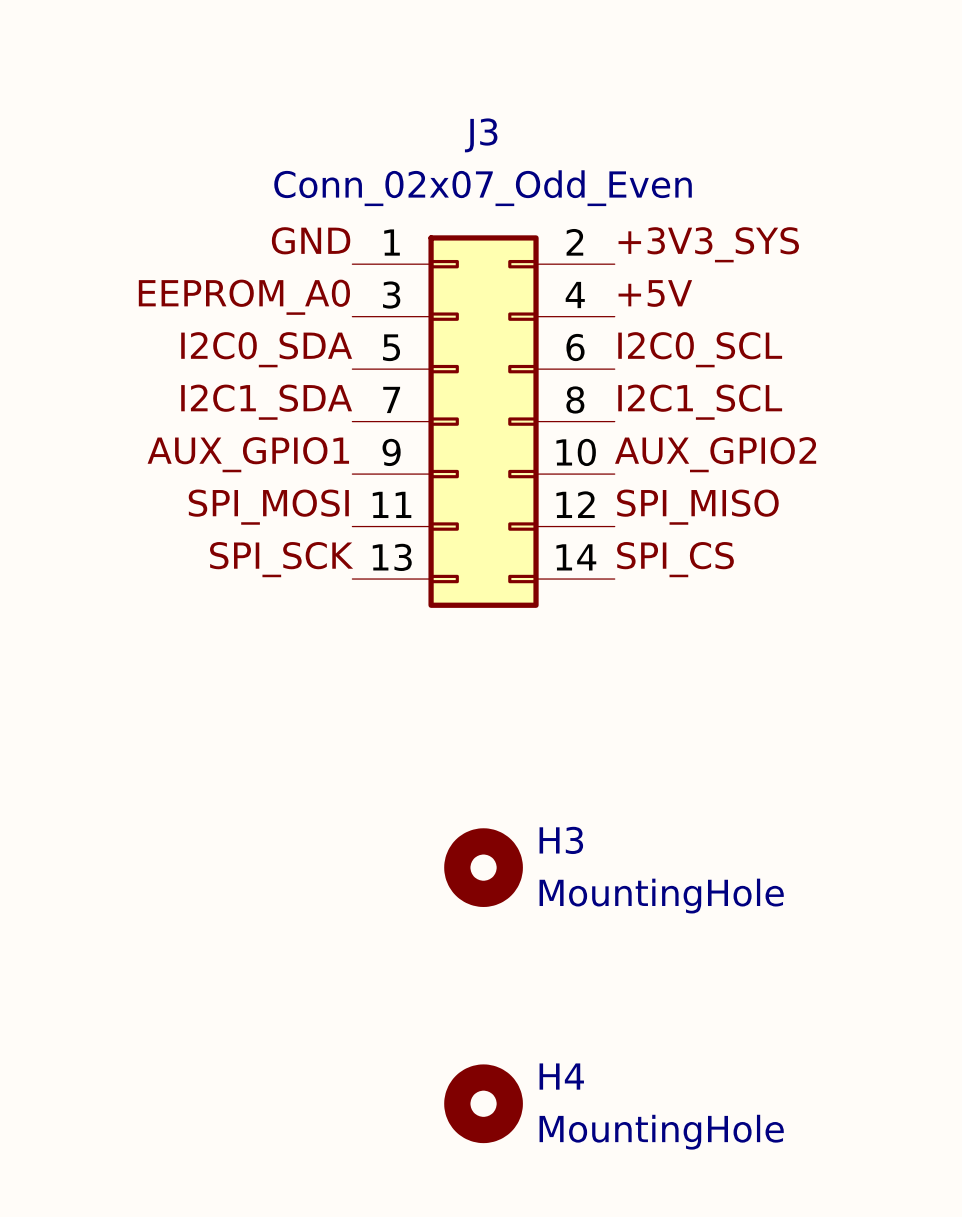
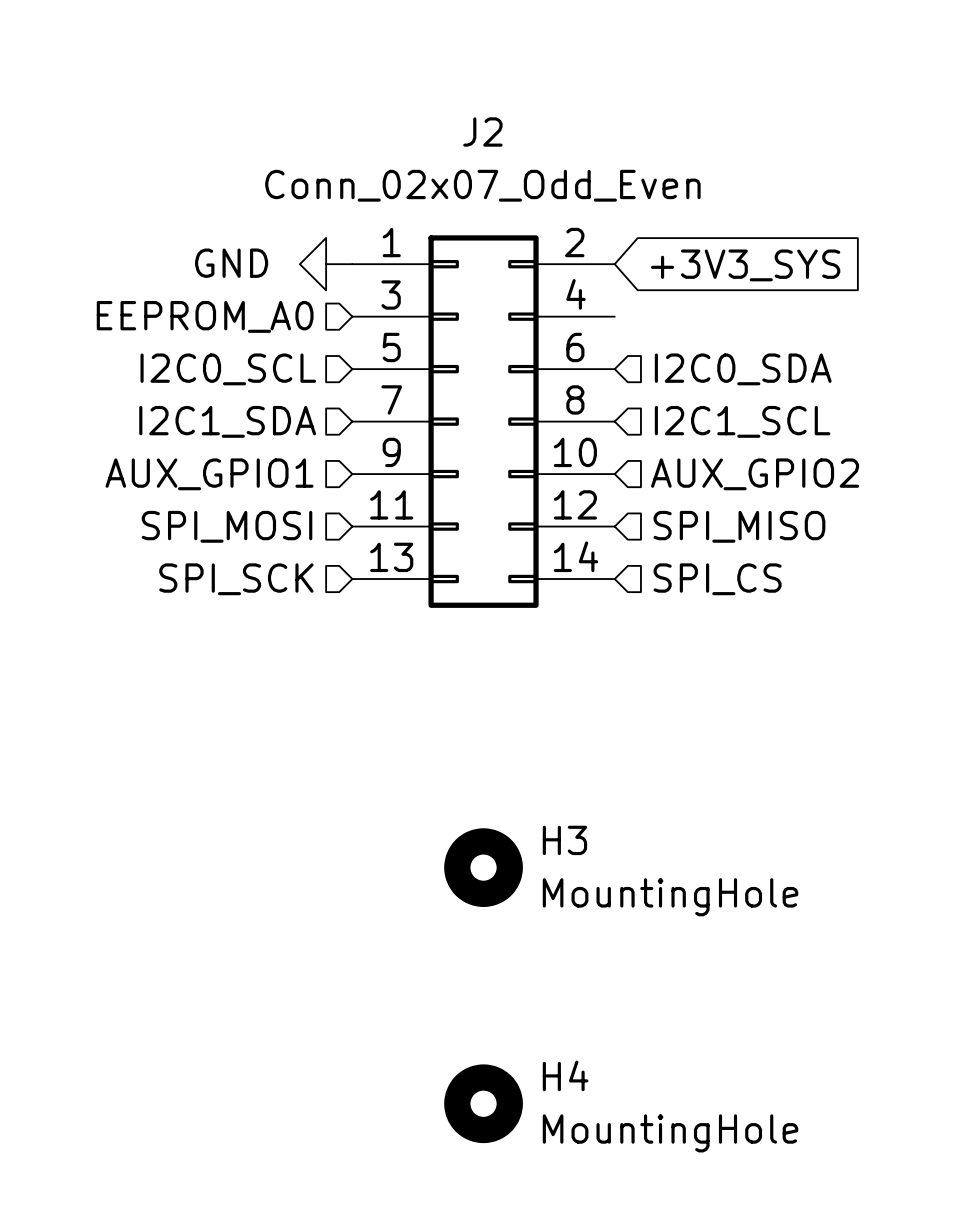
J3 name: J3 (481, 135) -> J2 (482, 132)
label: GND (311, 240) -> none
label: +3V3_SYS (708, 244) -> none
power symbol: none -> GND (326, 264)
global label: none -> +3V3_SYS (745, 265)
label: +5V (655, 293) -> none
label: EEPROM_A0 (244, 297) -> none
hierarchical label: none -> EEPROM_A0 (205, 316)
label: I2C0_SDA (266, 349) -> none
label: I2C0_SCL (700, 349) -> none
hierarchical label: none -> I2C0_SCL (228, 369)
hierarchical label: none -> I2C0_SDA (743, 369)
label: I2C1_SDA (266, 402) -> none
label: I2C1_SCL (700, 402) -> none
hierarchical label: none -> I2C1_SDA (227, 421)
hierarchical label: none -> I2C1_SCL (742, 421)
label: AUX_GPIO1 (248, 454) -> none
label: AUX_GPIO2 (715, 454) -> none
hierarchical label: none -> AUX_GPIO1 (209, 474)
hierarchical label: none -> AUX_GPIO2 (755, 474)
label: SPI_MOSI (268, 507) -> none
label: SPI_MISO (697, 507) -> none
hierarchical label: none -> SPI_MOSI (227, 526)
hierarchical label: none -> SPI_MISO (739, 526)
label: SPI_SCK (281, 559) -> none
label: SPI_CS (675, 559) -> none
hierarchical label: none -> SPI_SCK (236, 579)
hierarchical label: none -> SPI_CS (717, 579)

